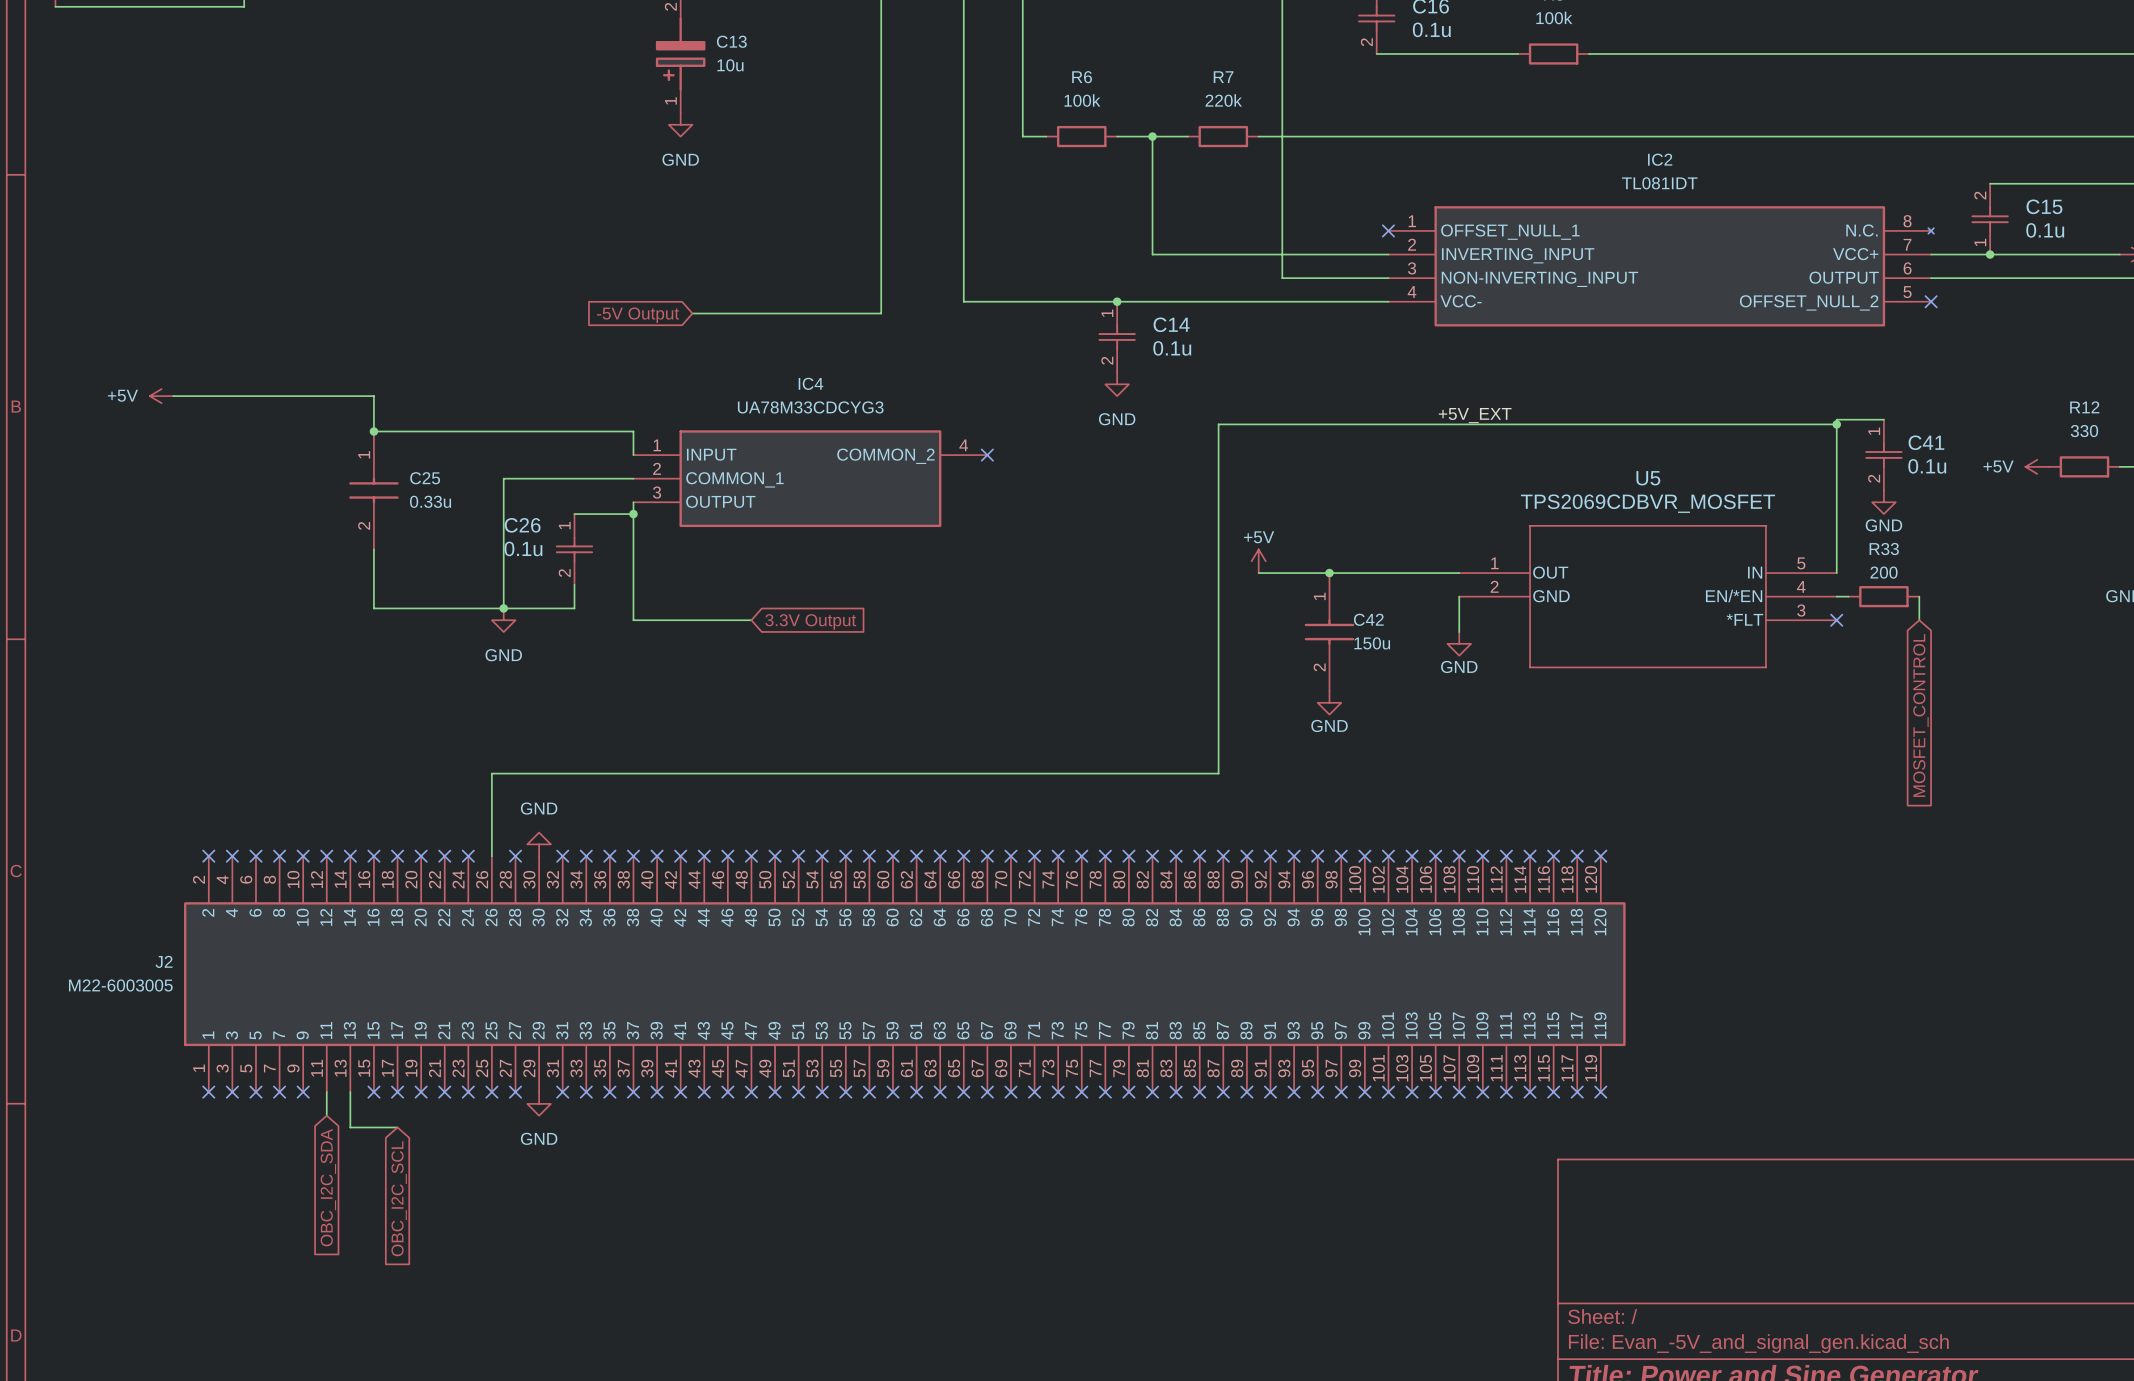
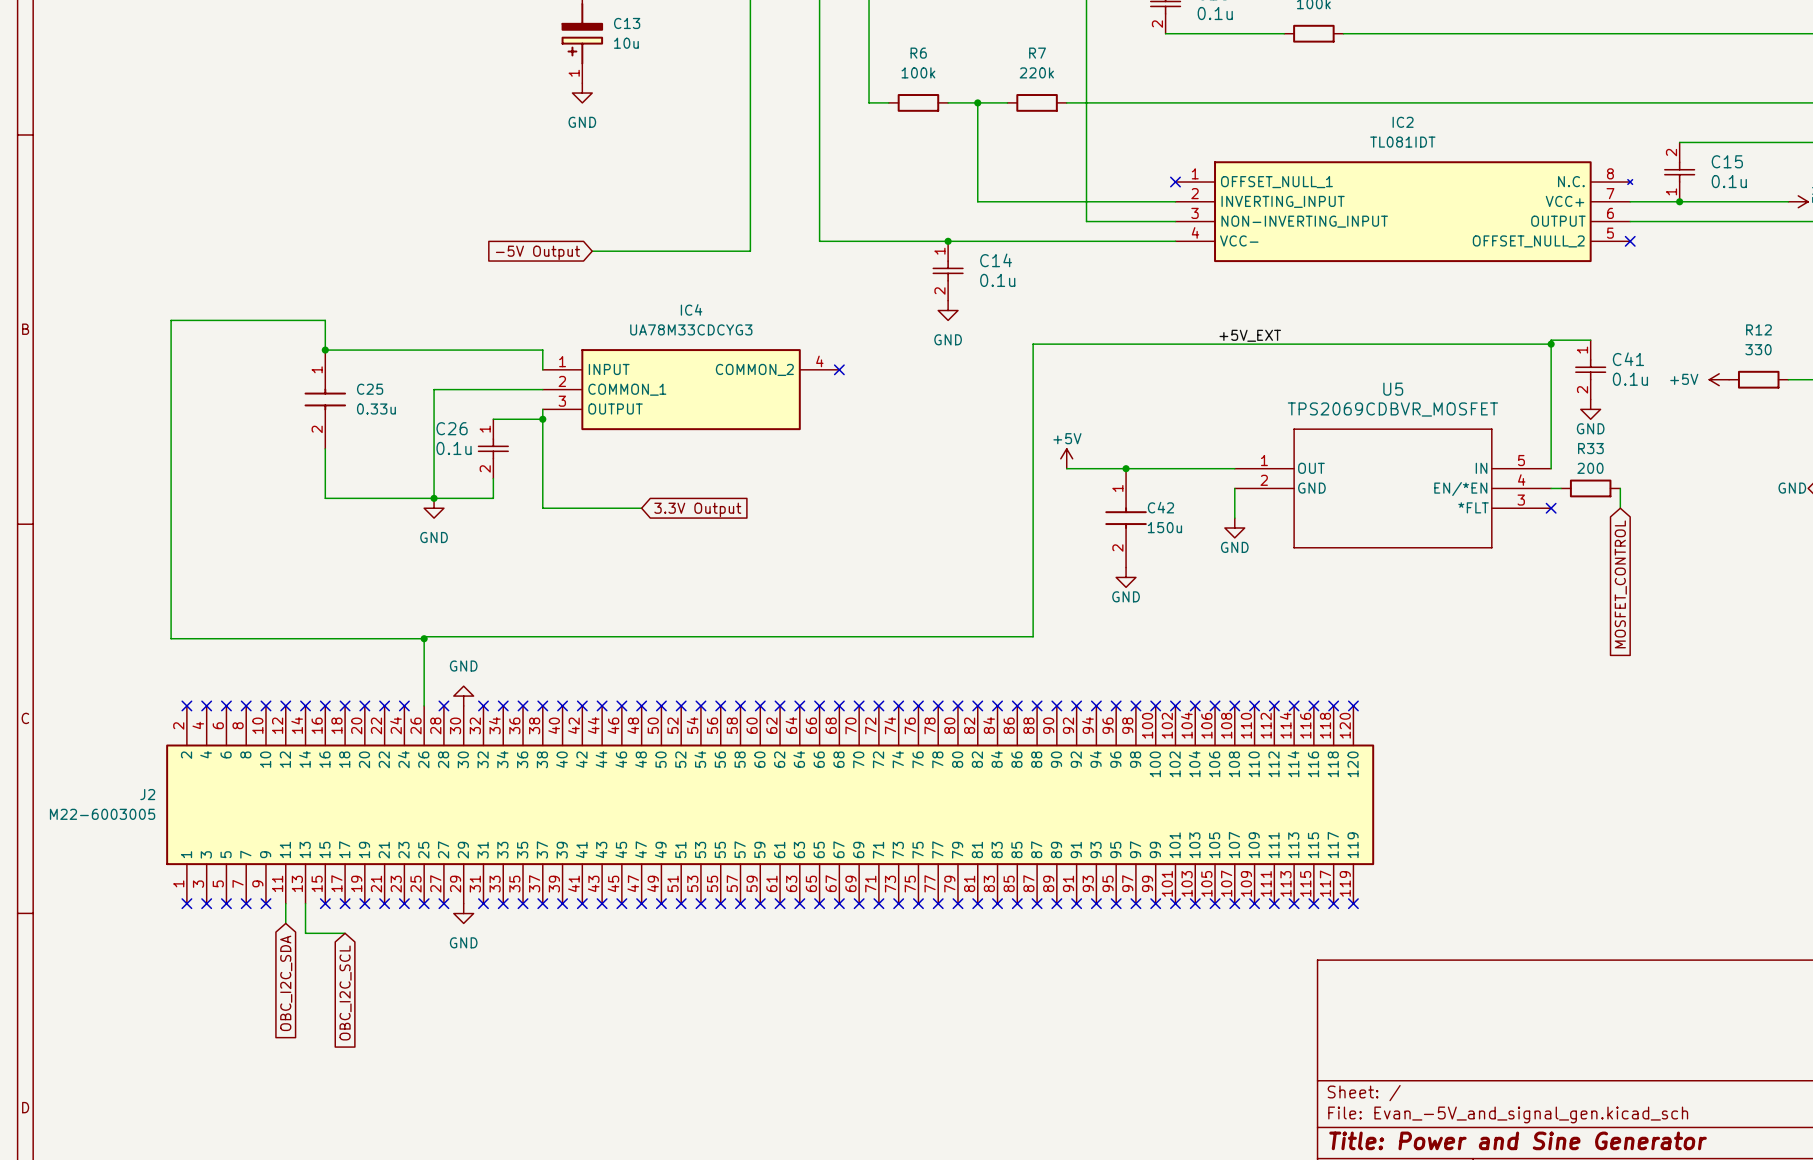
power symbol: +5V (161, 396) -> none
wire: (173, 396) (189, 396) -> (424, 638) (171, 638) (171, 320)
junction: none -> (424, 638)

